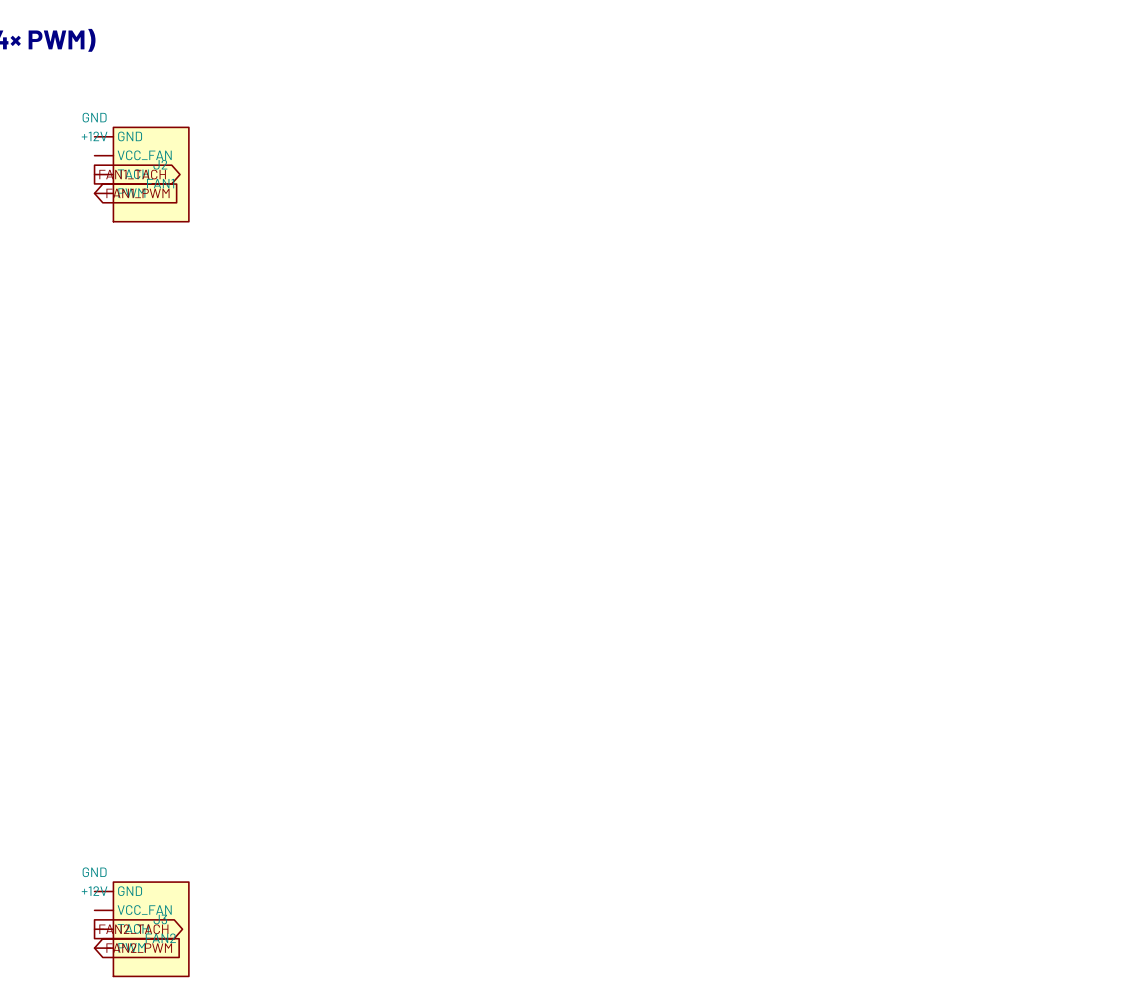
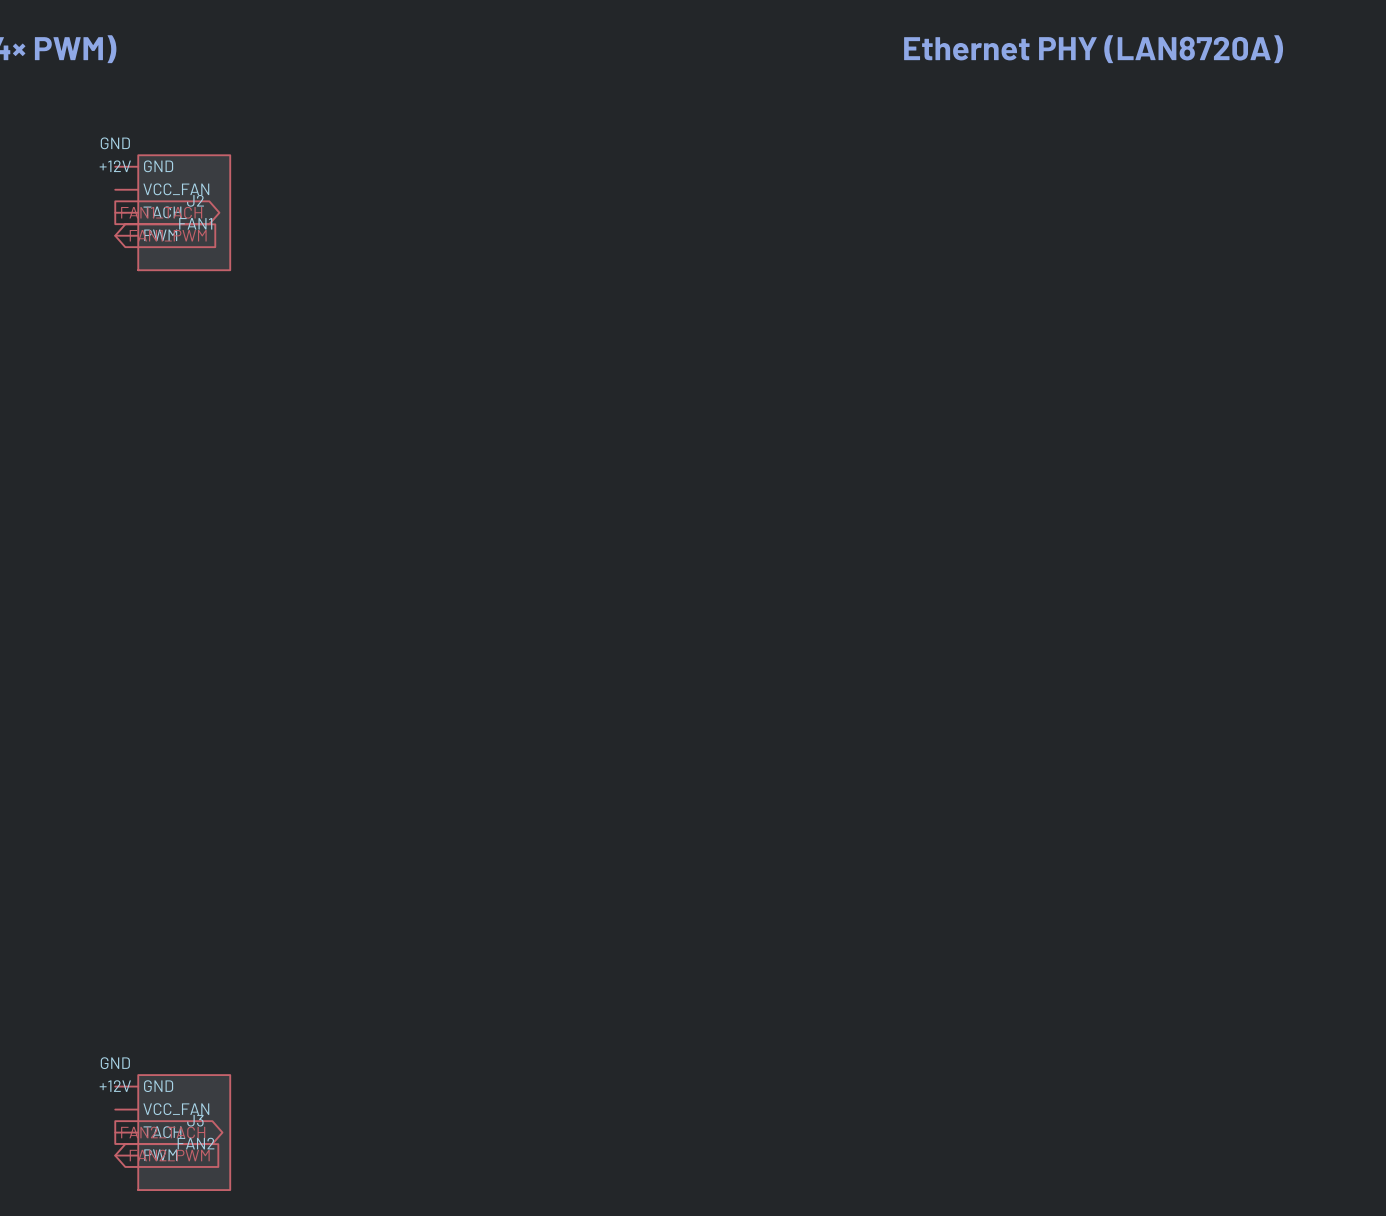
text: none -> Ethernet PHY (LAN8720A) (1093, 49)

